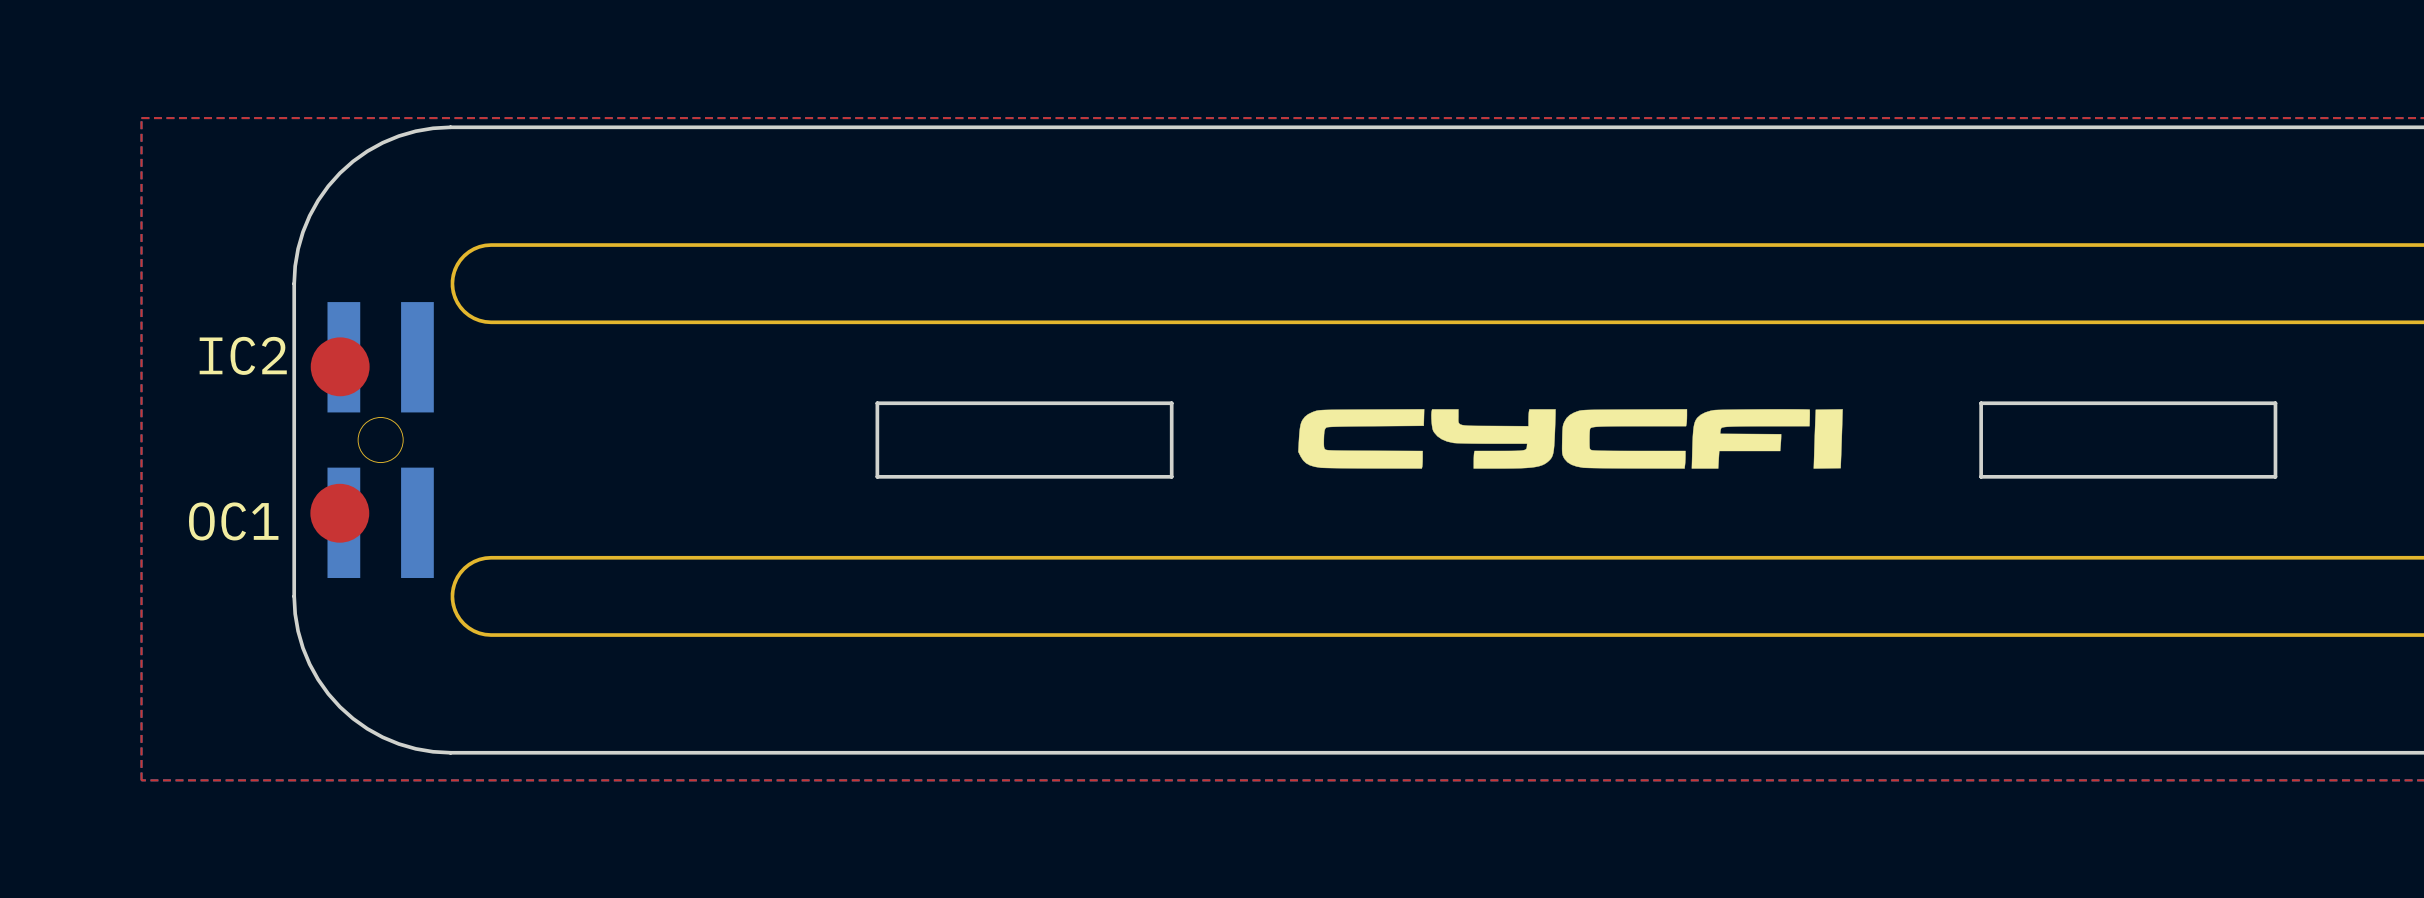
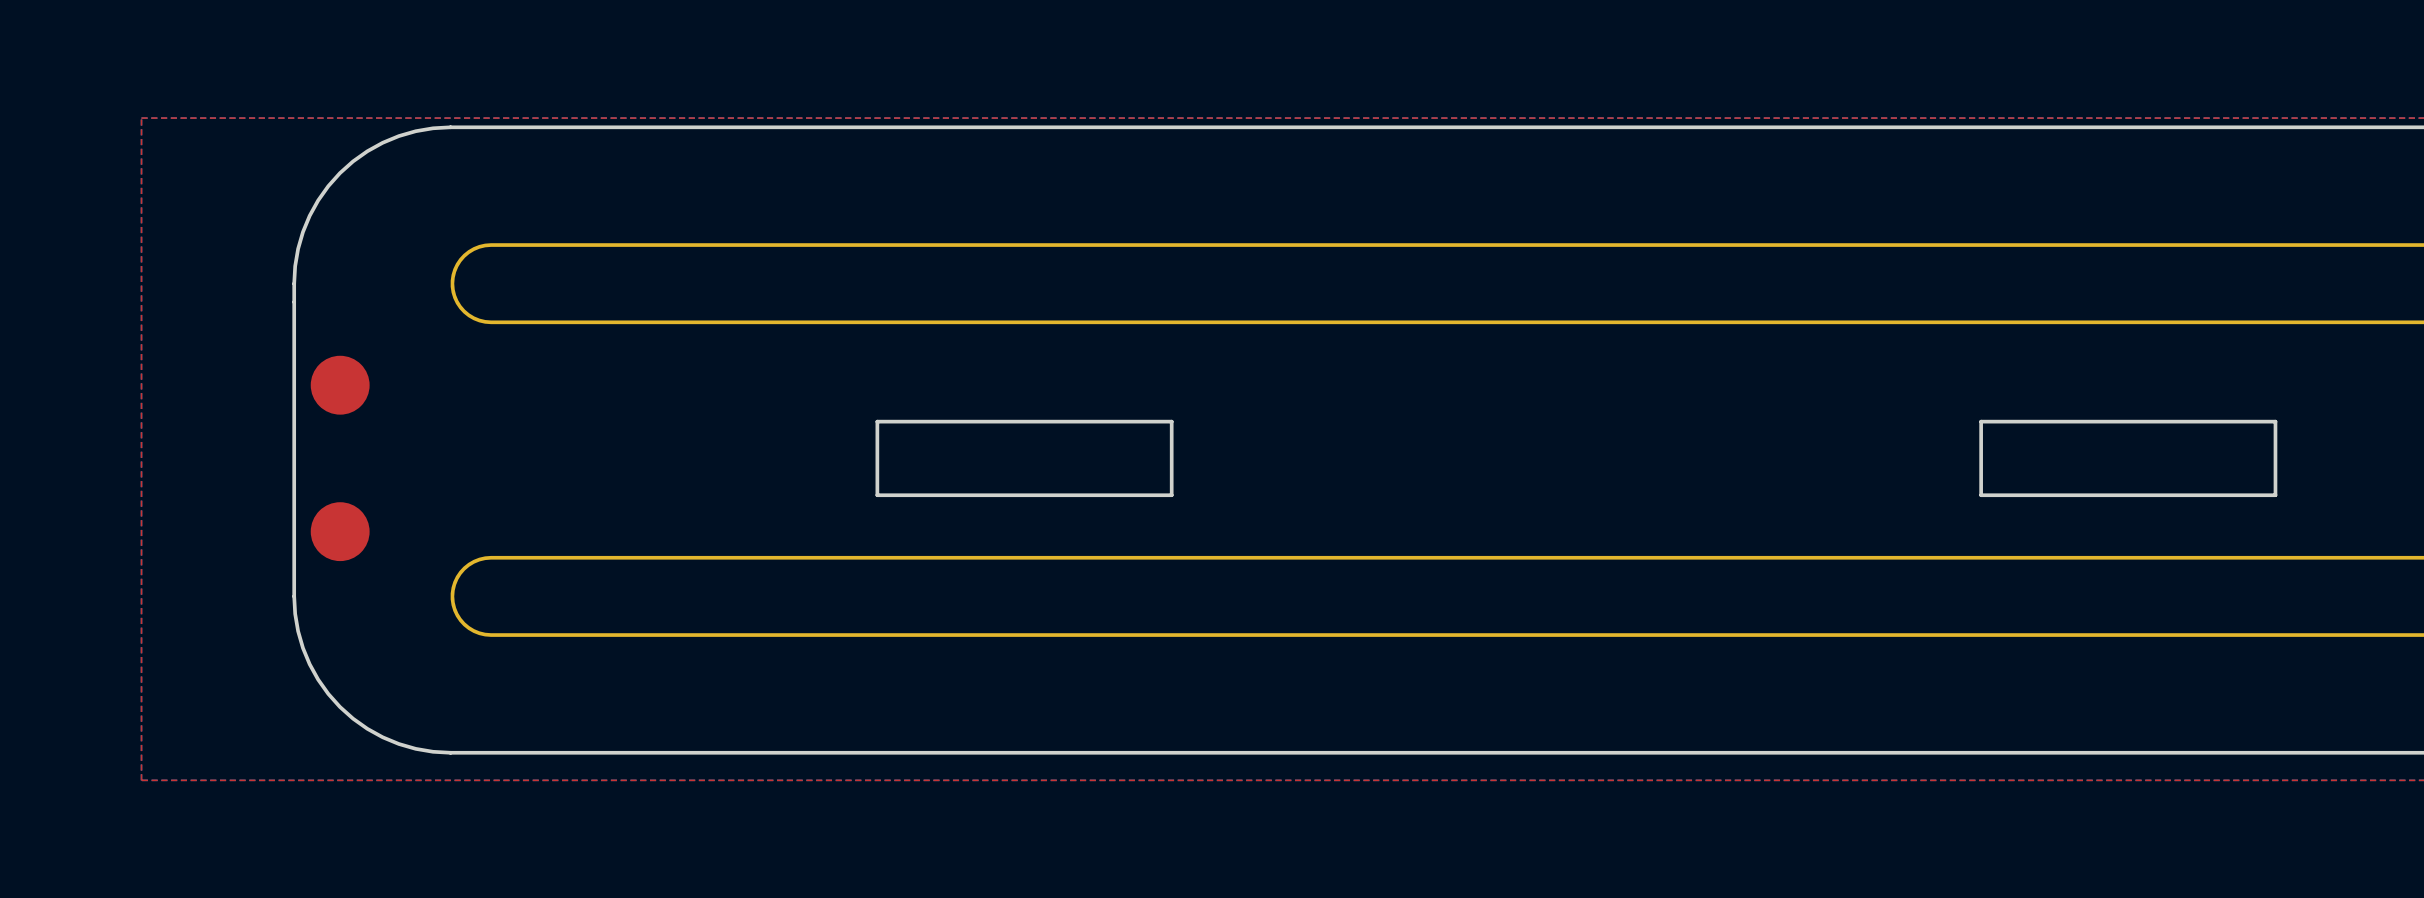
IC2 name: IC2 (243, 355) -> none
IC2 position: (340, 366) -> (340, 385)
drawing: [1298, 409, 1843, 469] -> none
board edge: (877, 421) (877, 403) (1171, 403) (1171, 421) -> (877, 421) (1171, 421)
board edge: (1981, 421) (1981, 403) (2275, 403) (2275, 421) -> (1981, 421) (2275, 421)
part: (380, 440) -> none
board edge: (877, 476) (1171, 476) -> (877, 476) (877, 495) (1171, 495) (1171, 476)
board edge: (1981, 476) (2275, 476) -> (1981, 476) (1981, 495) (2275, 495) (2275, 476)
OC1 position: (339, 513) -> (340, 531)
OC1 name: OC1 (233, 521) -> none

